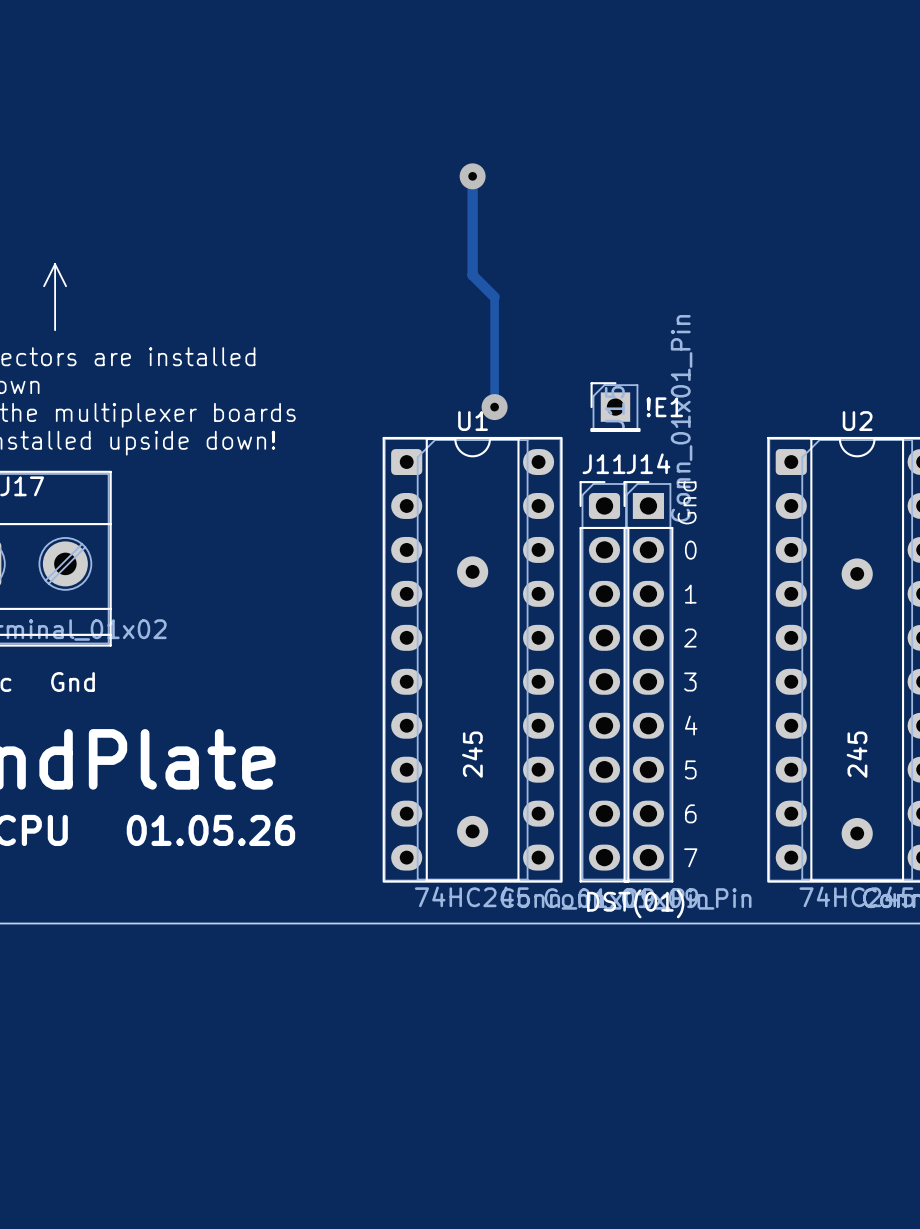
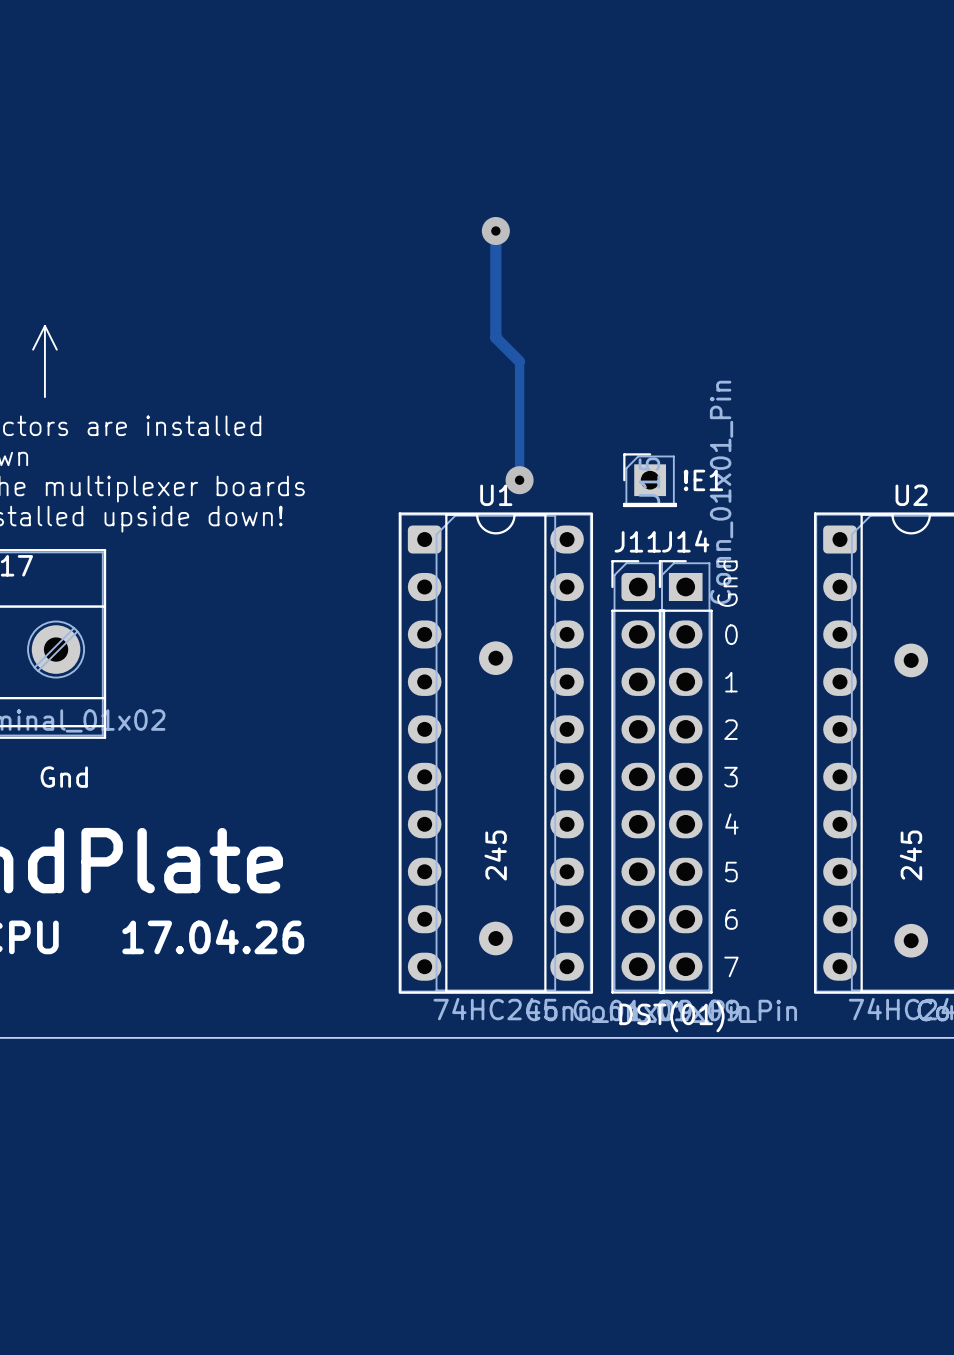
text: none -> 17.04.26 (213, 936)
text: 01.05.26 (210, 830) -> none

